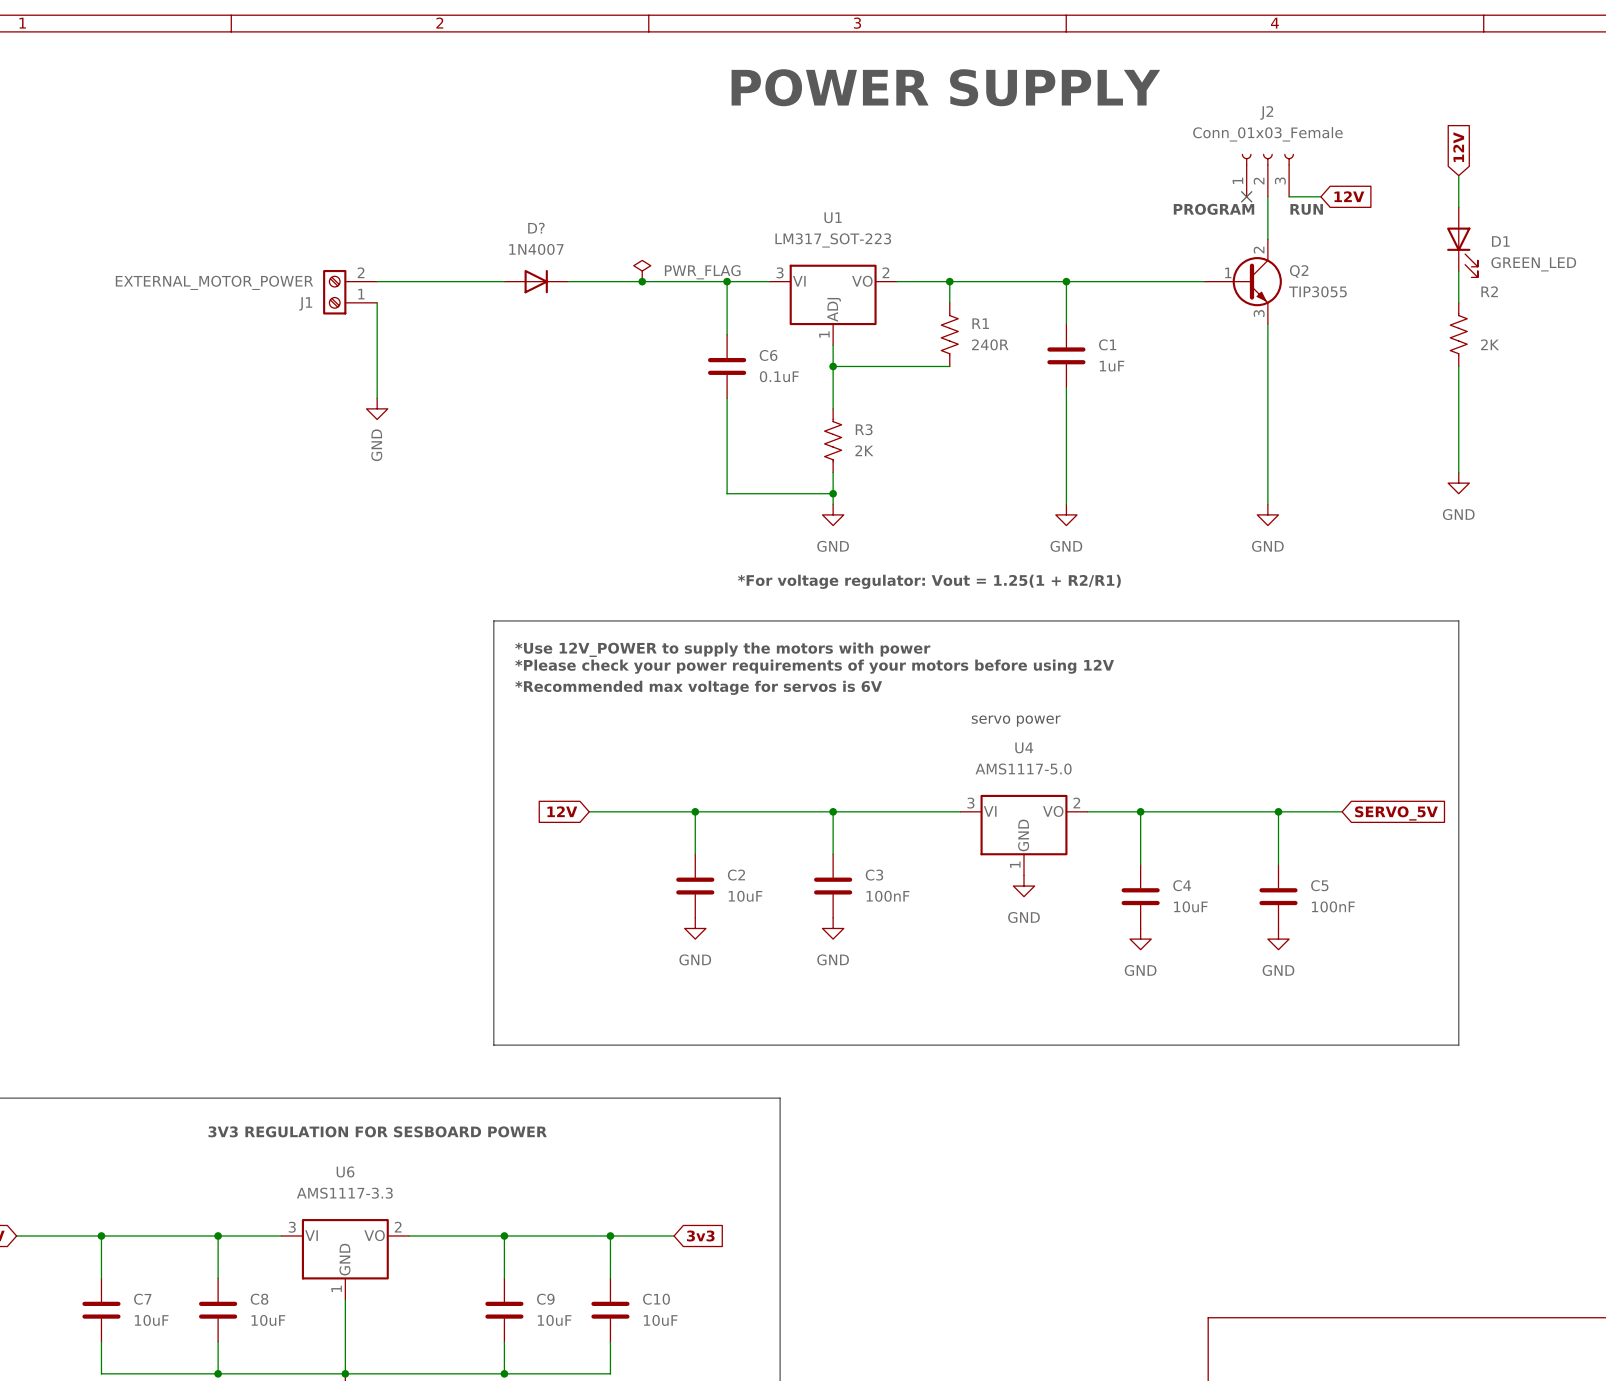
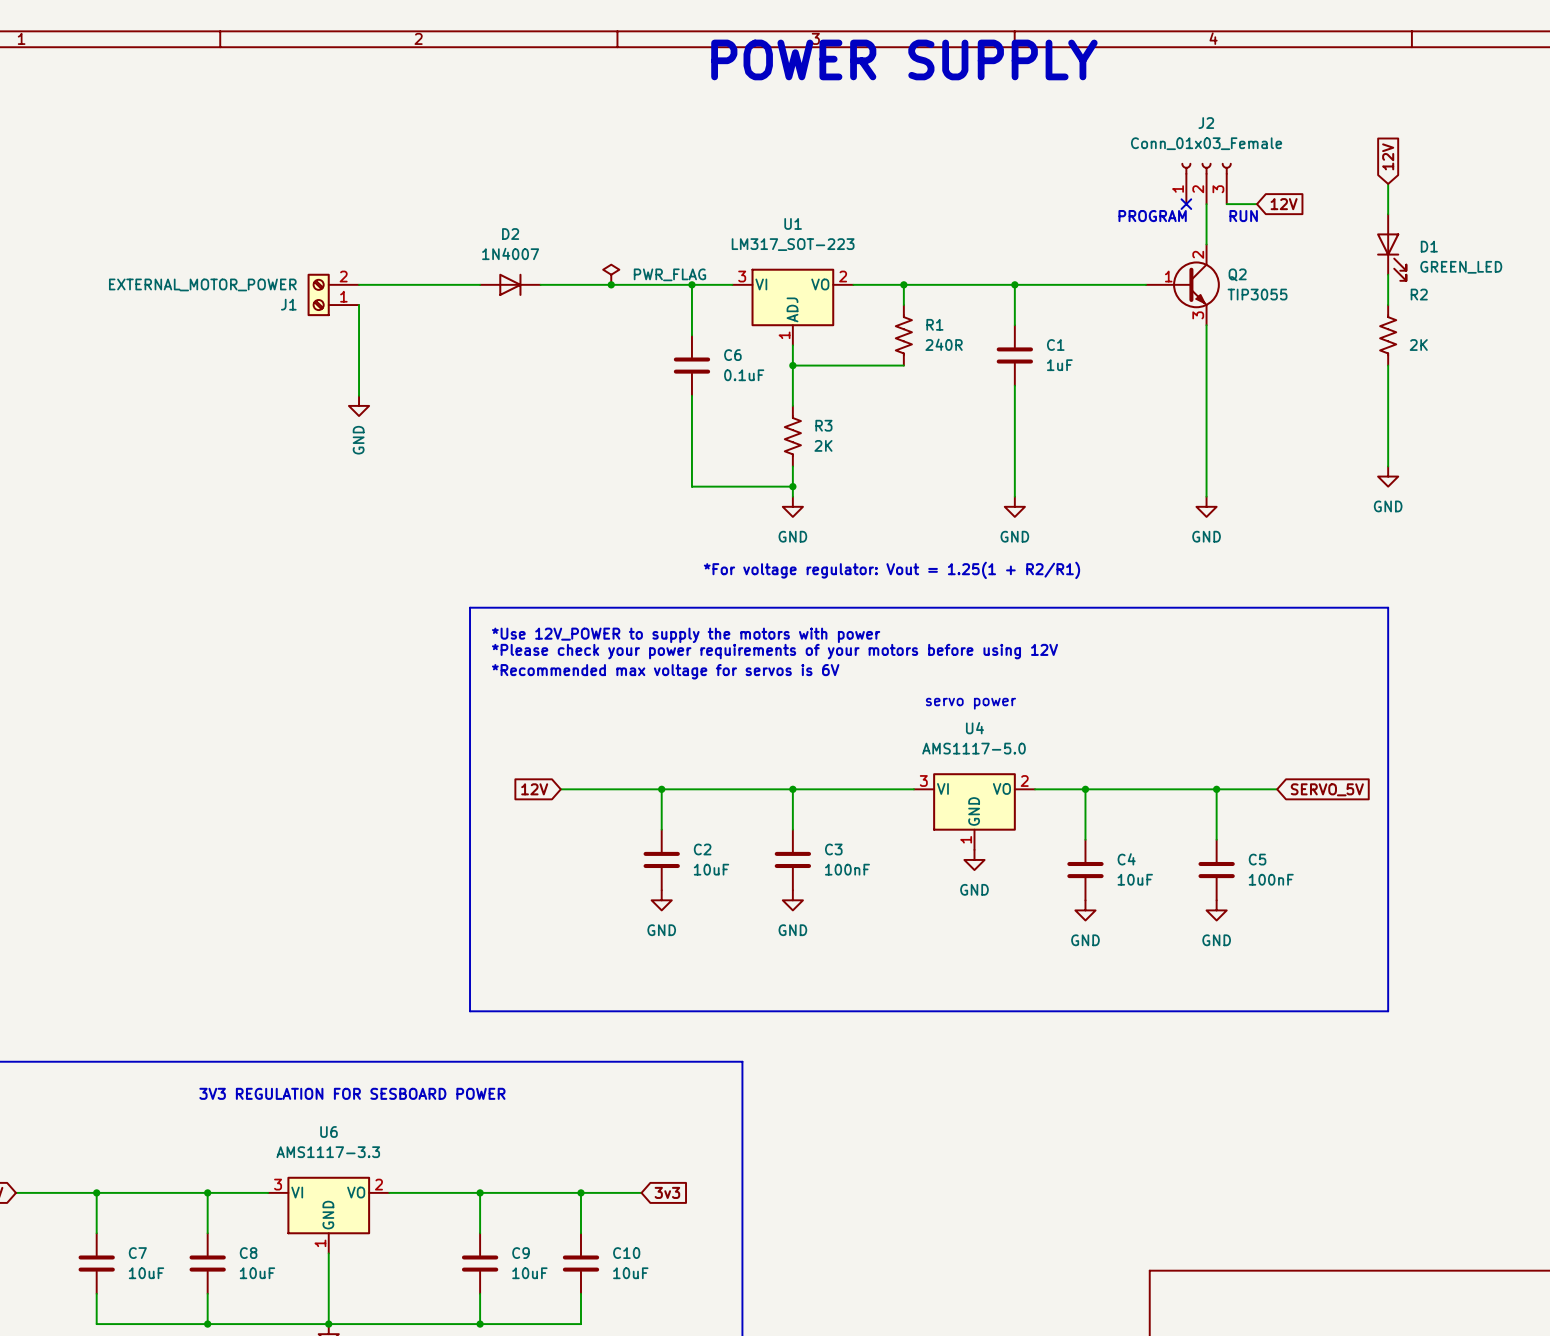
text position: POWER SUPPLY (945, 87) -> POWER SUPPLY (904, 59)
D? name: D? (536, 228) -> D2 (510, 234)

